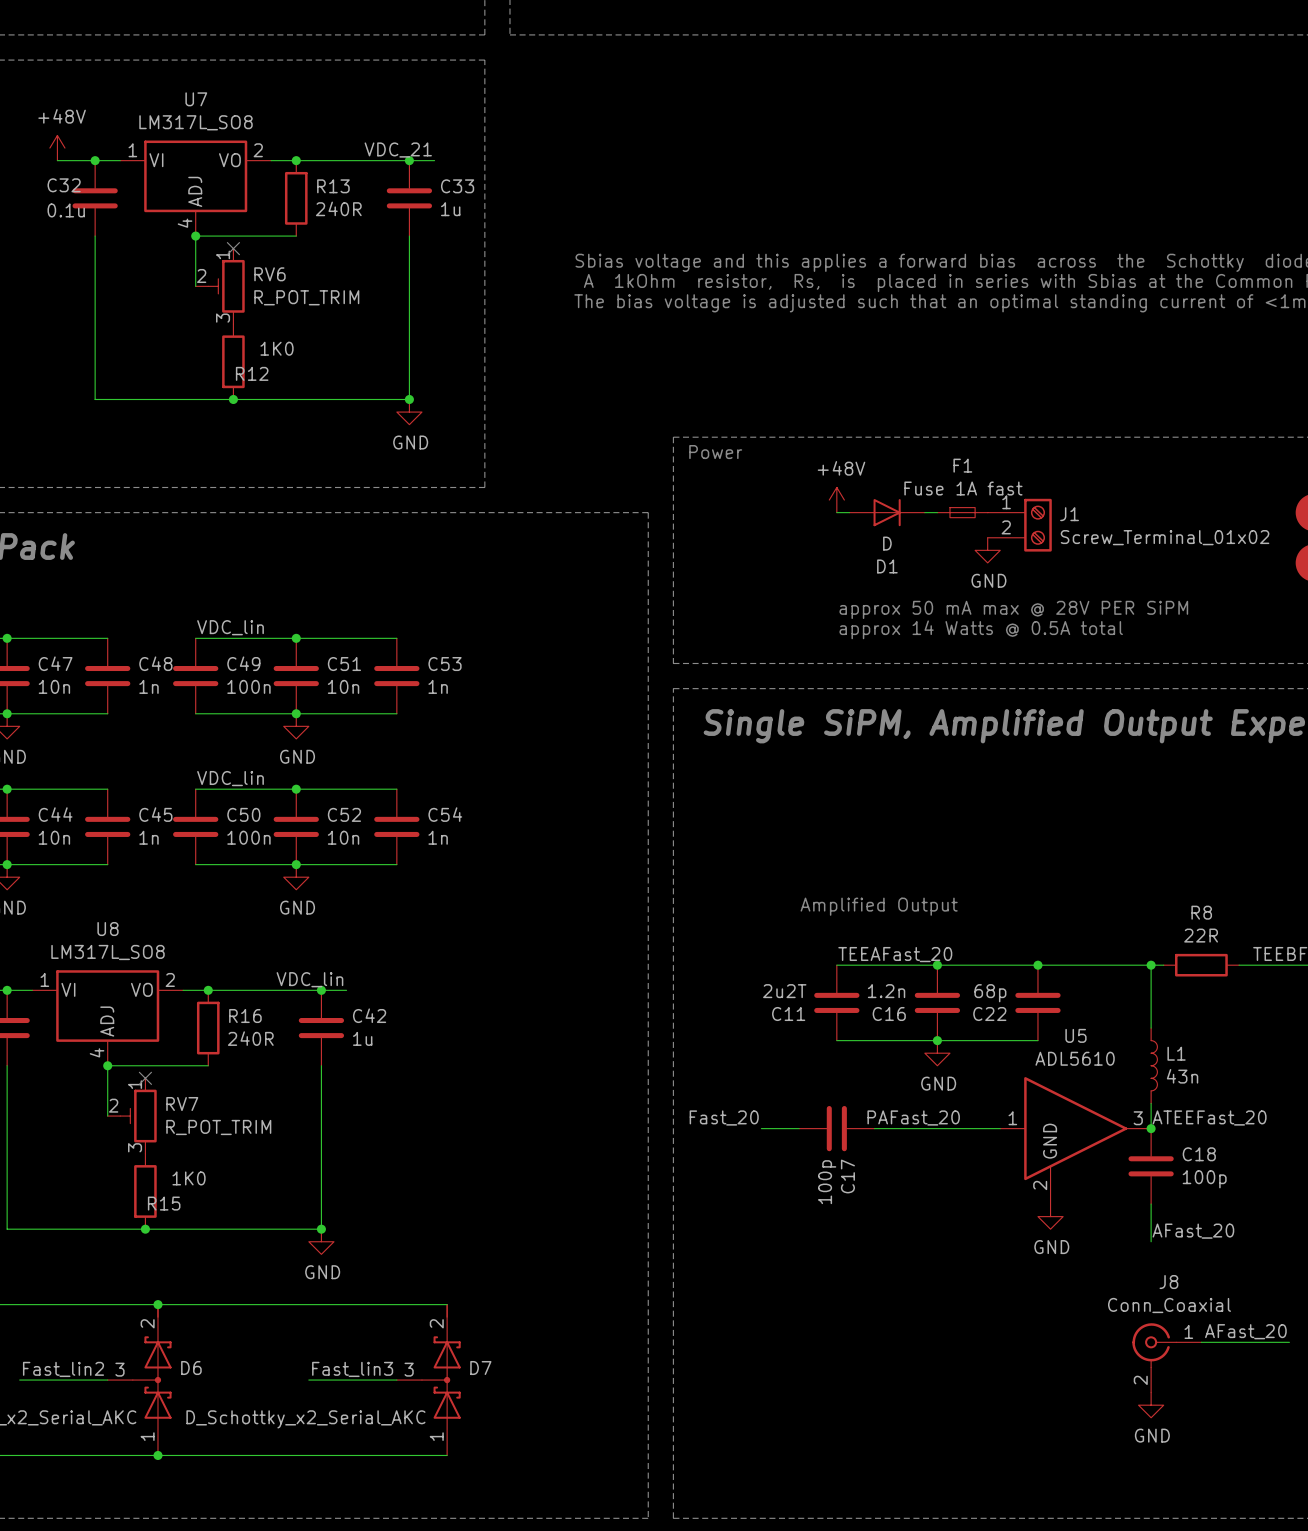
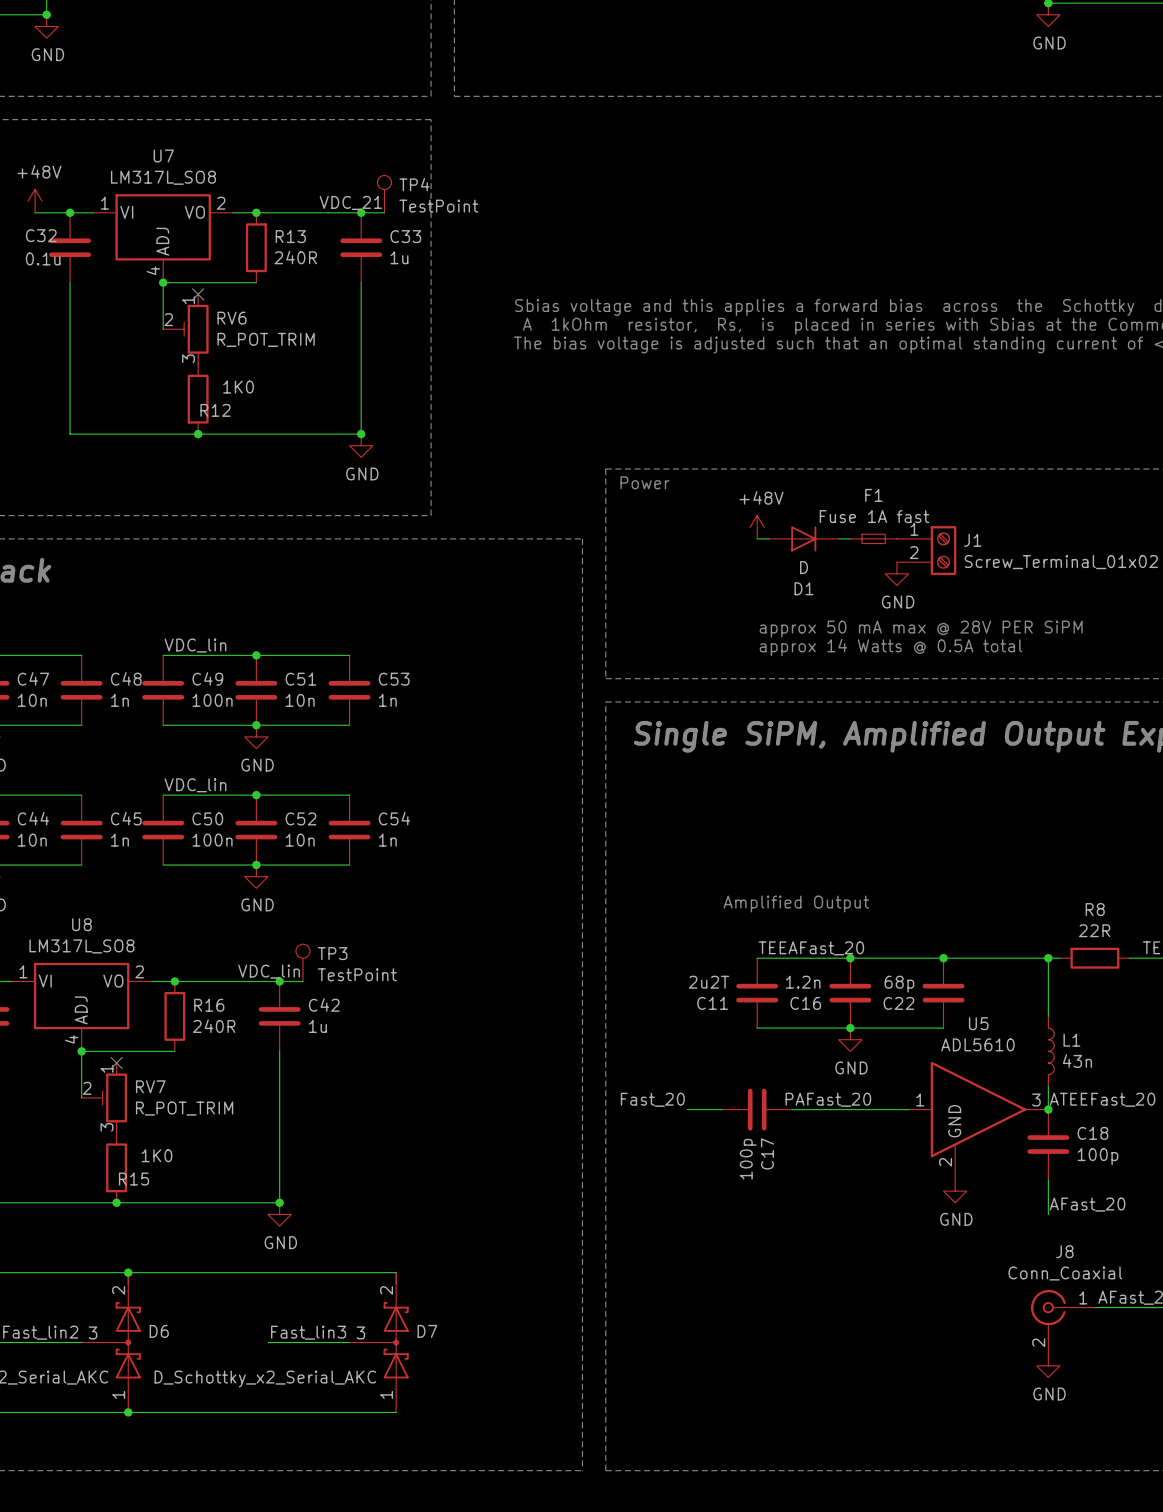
TP4: none -> TestPoint (384, 194)
TP3: none -> TestPoint (302, 962)

